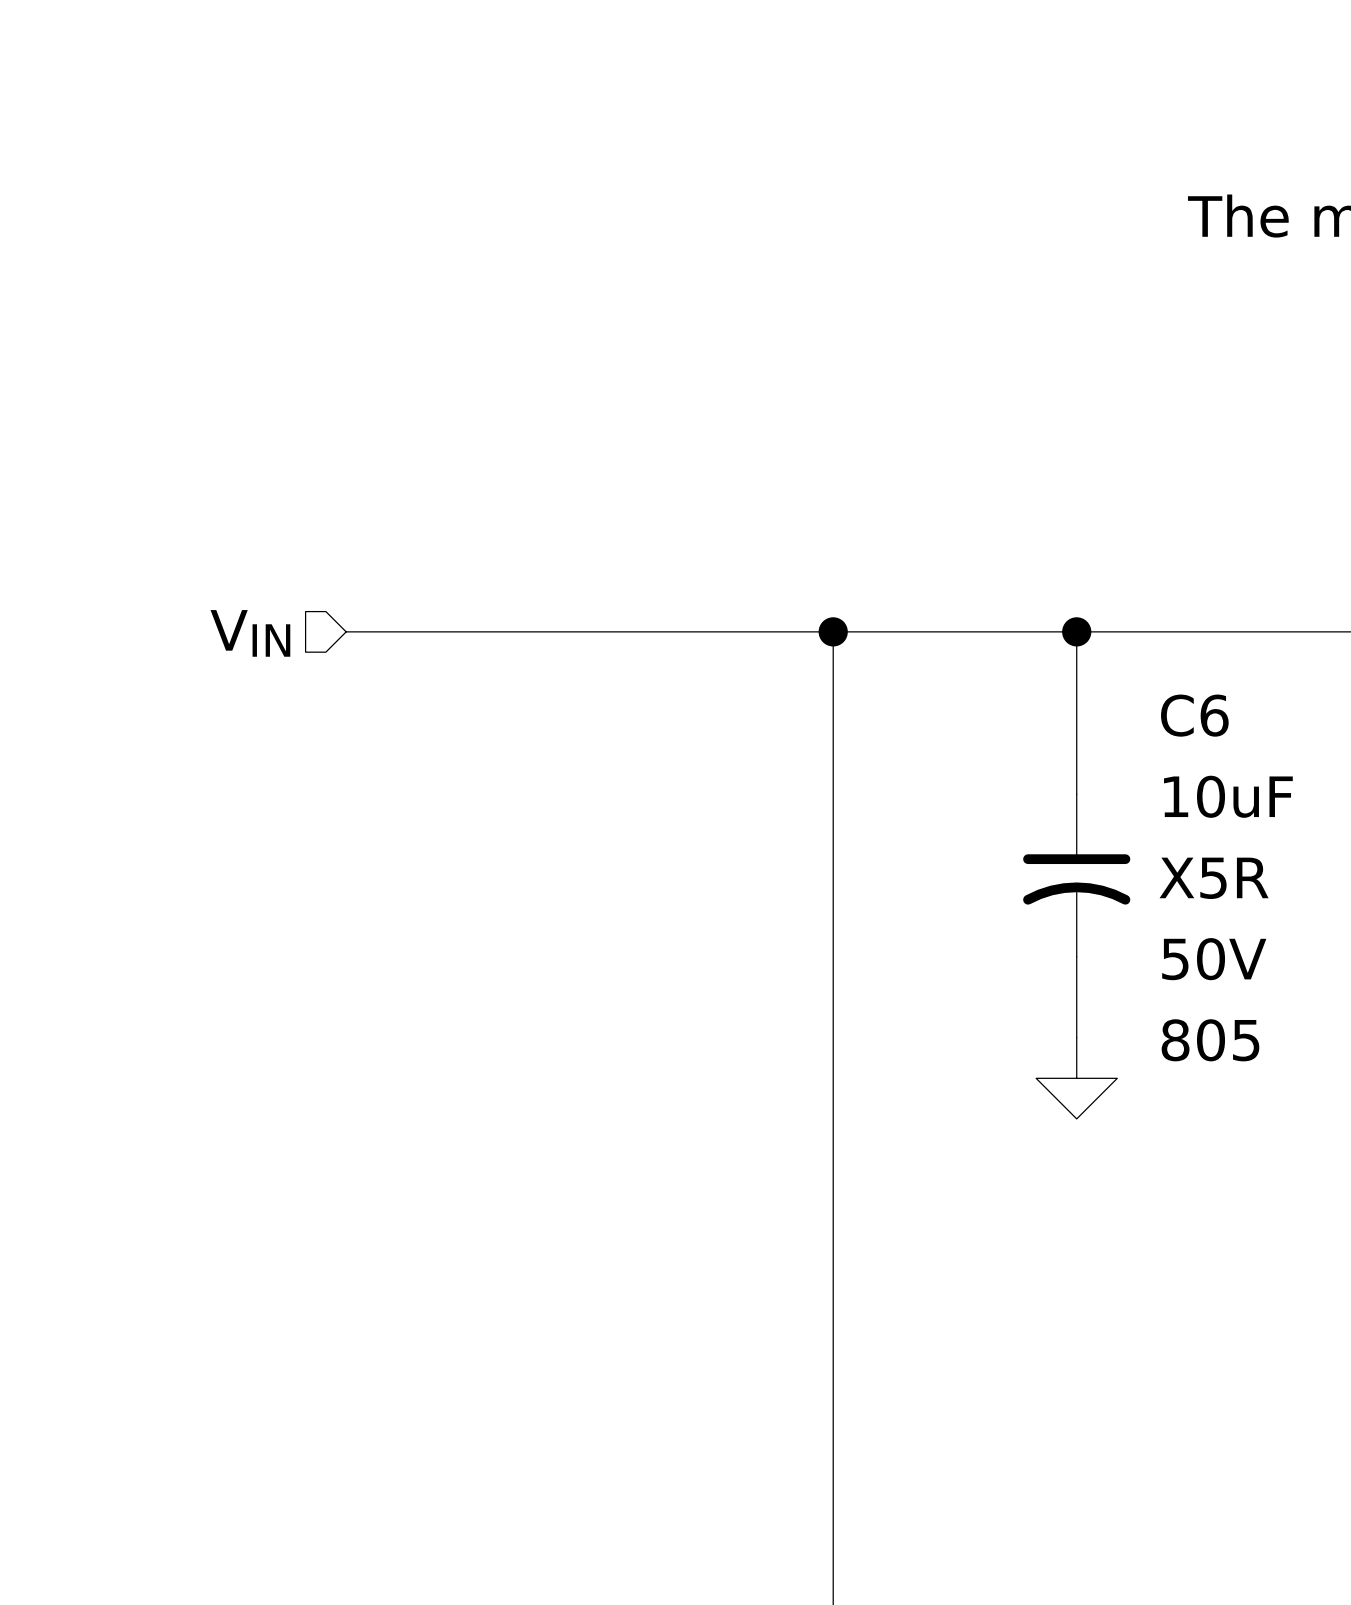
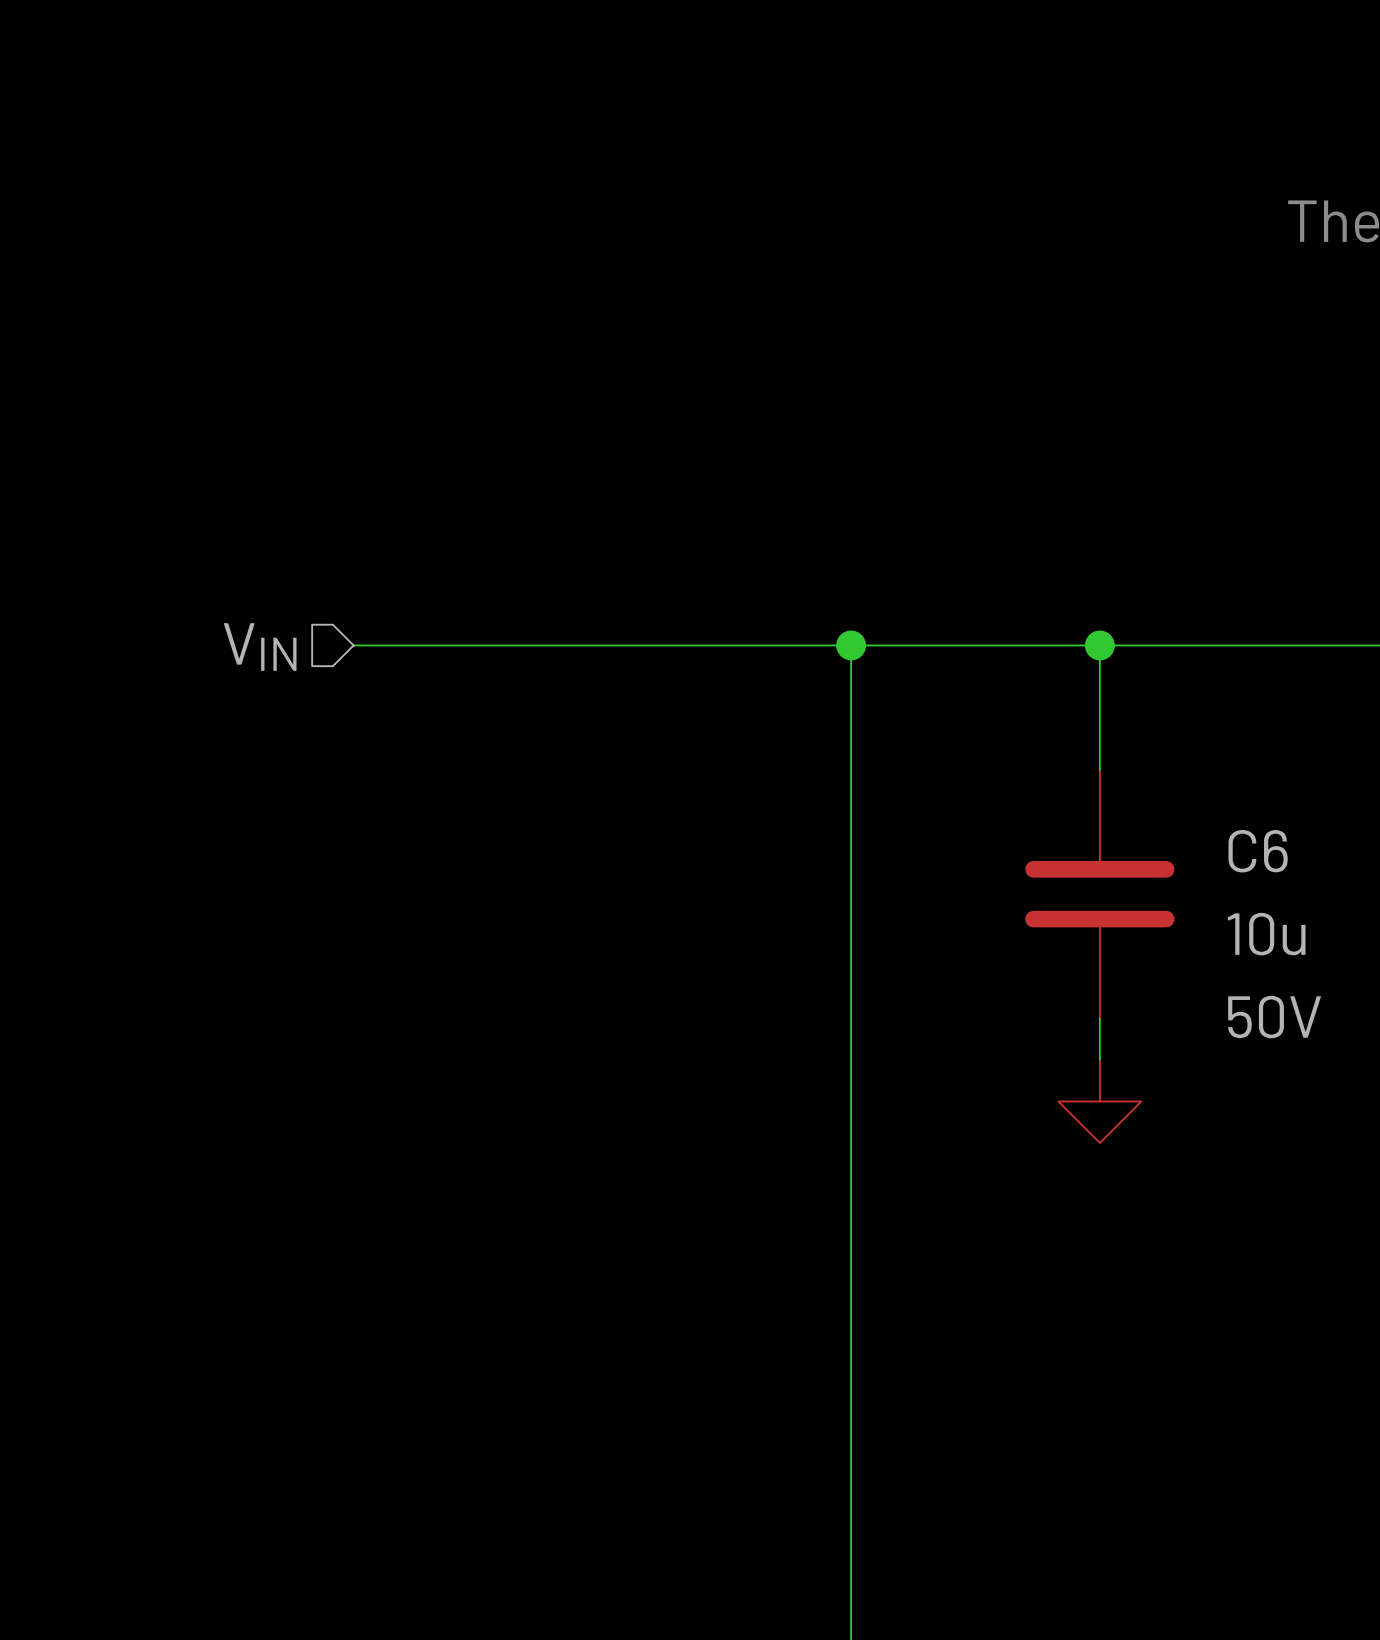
C6 name position: C6 (1194, 715) -> C6 (1258, 851)
C6 symbol: [1023, 794, 1131, 957] -> [1025, 769, 1175, 1019]
C6 value: 10uF (1228, 796) -> 10u (1266, 934)
C6 text: X5R (1214, 878) -> none
C6 text: 805 (1210, 1040) -> none

